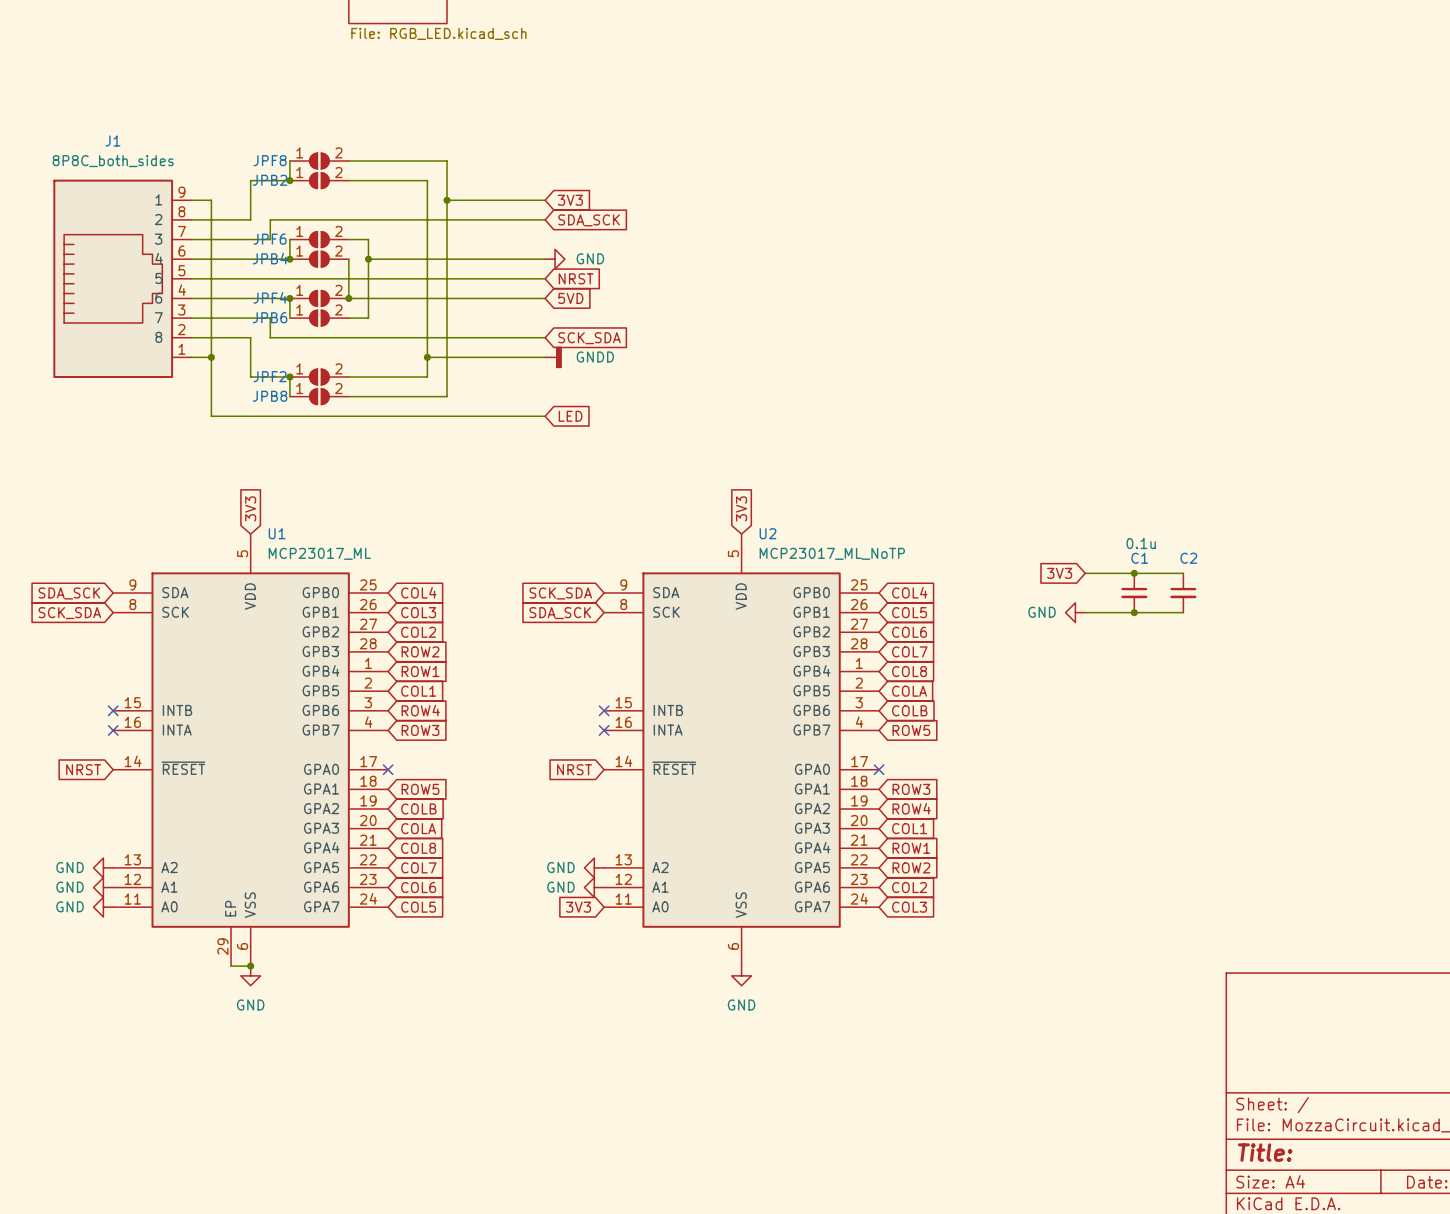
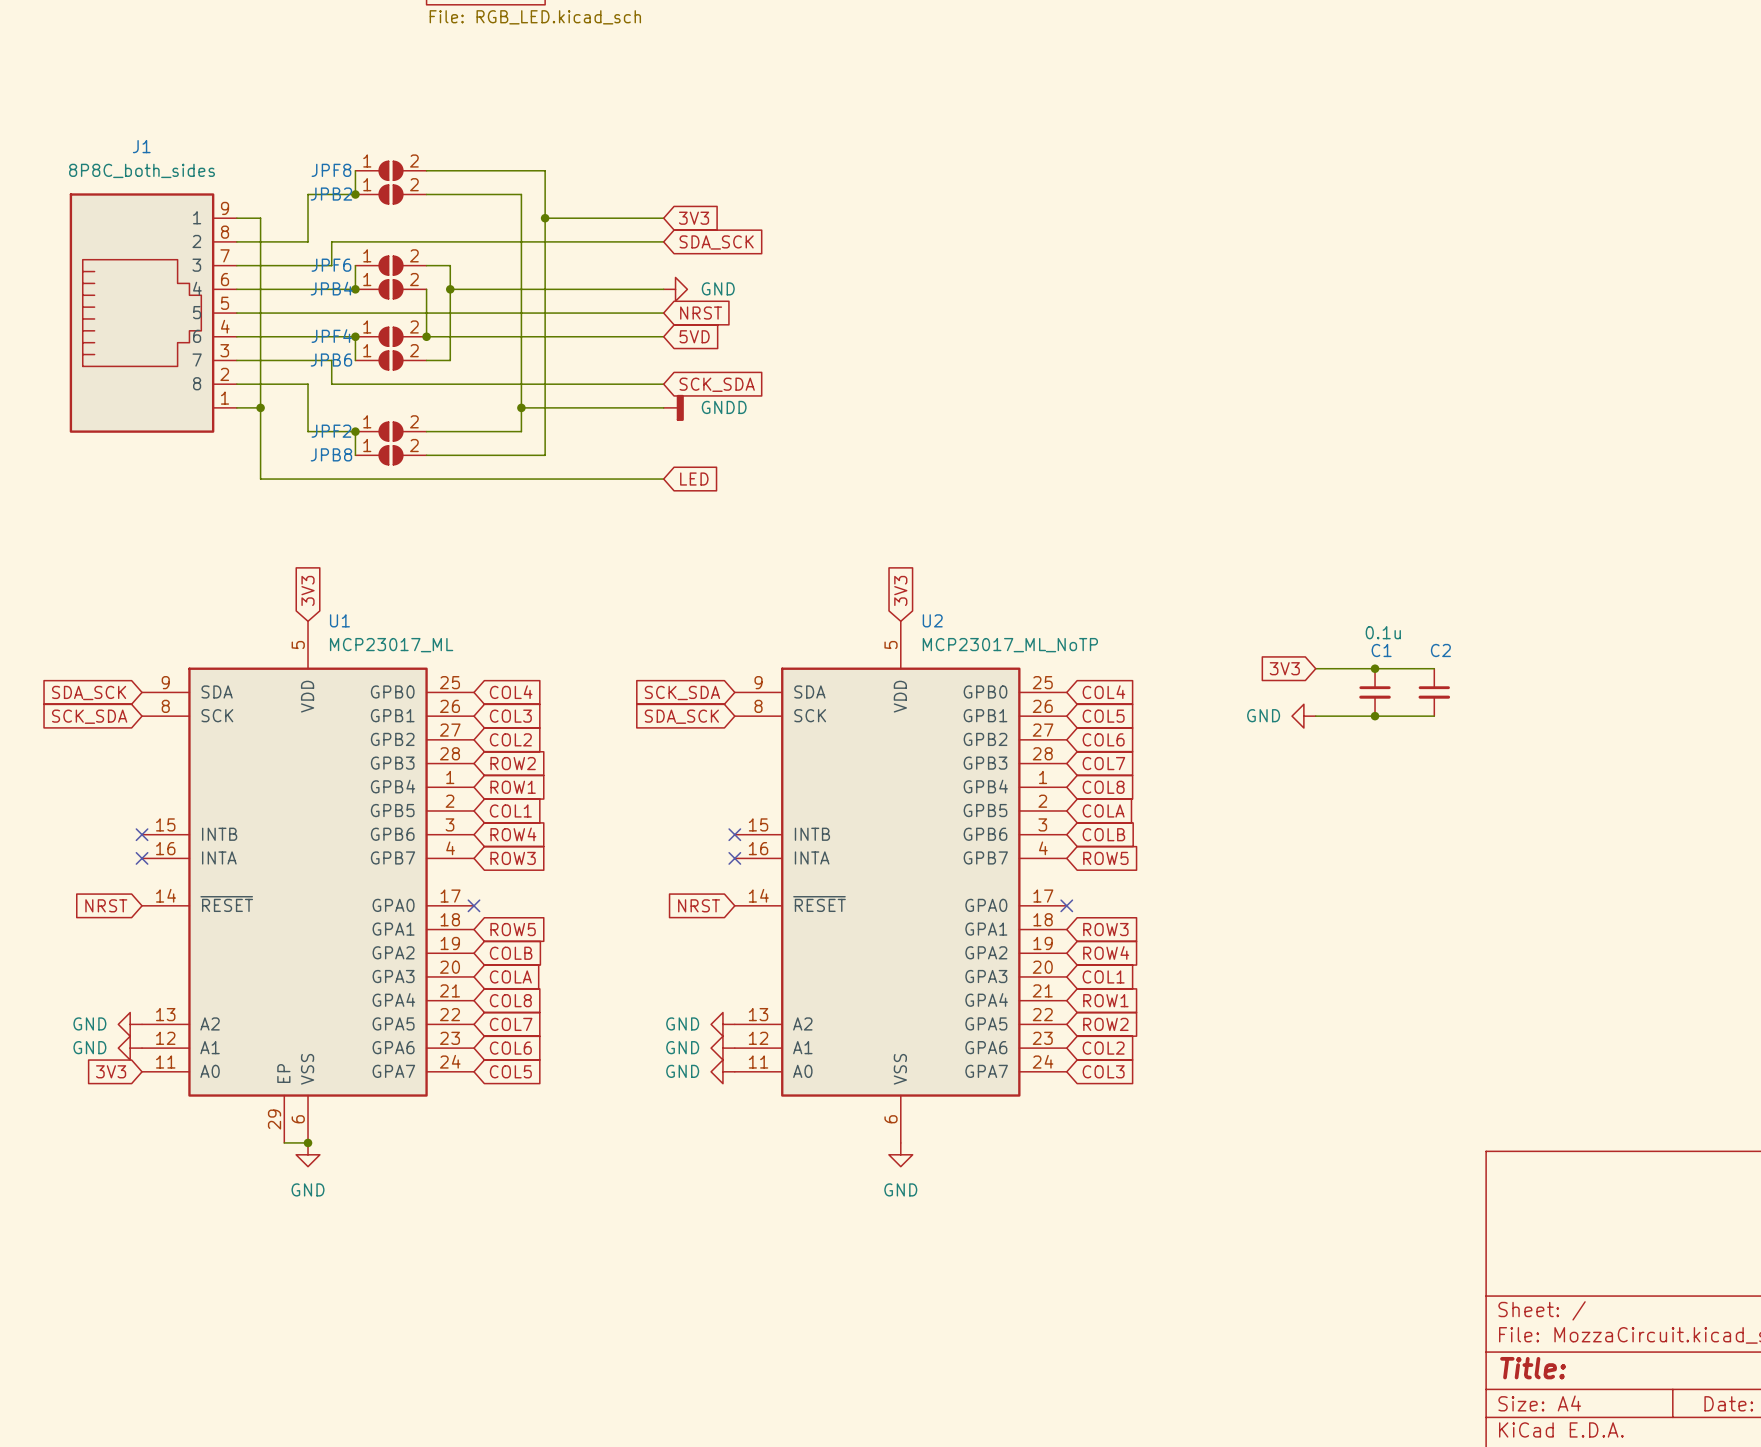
global label: none -> 3V3 (111, 1071)
power symbol: GND (103, 907) -> none
global label: 3V3 (578, 907) -> none
power symbol: none -> GND (722, 1071)

